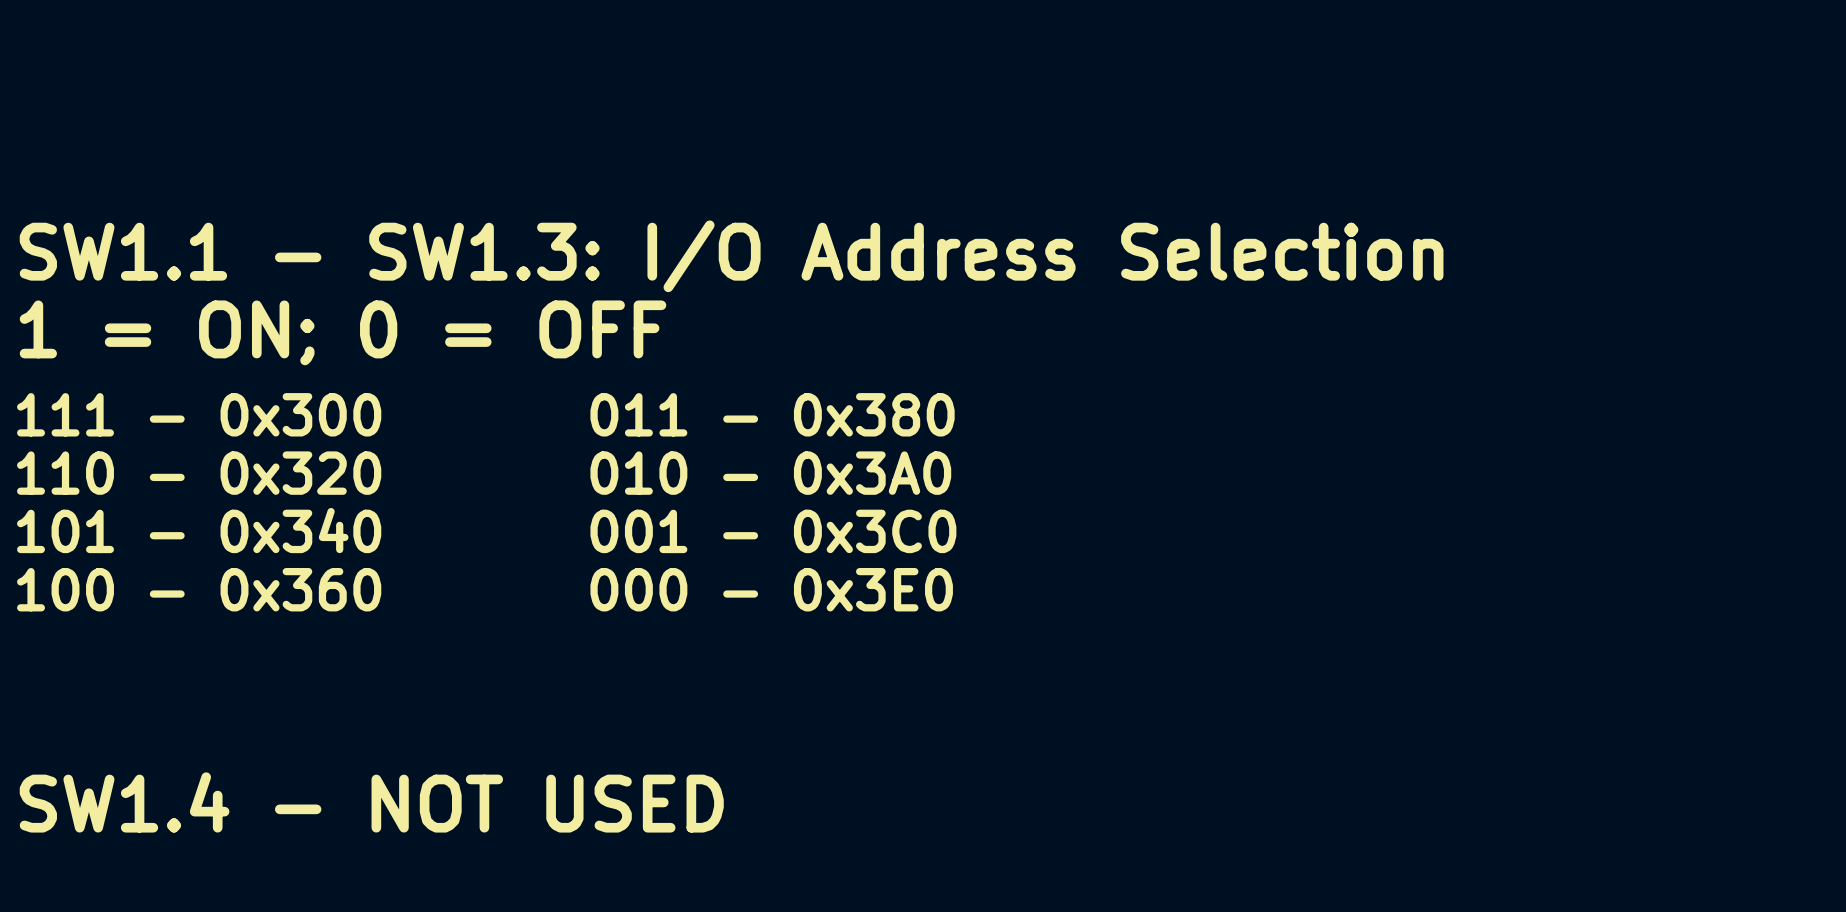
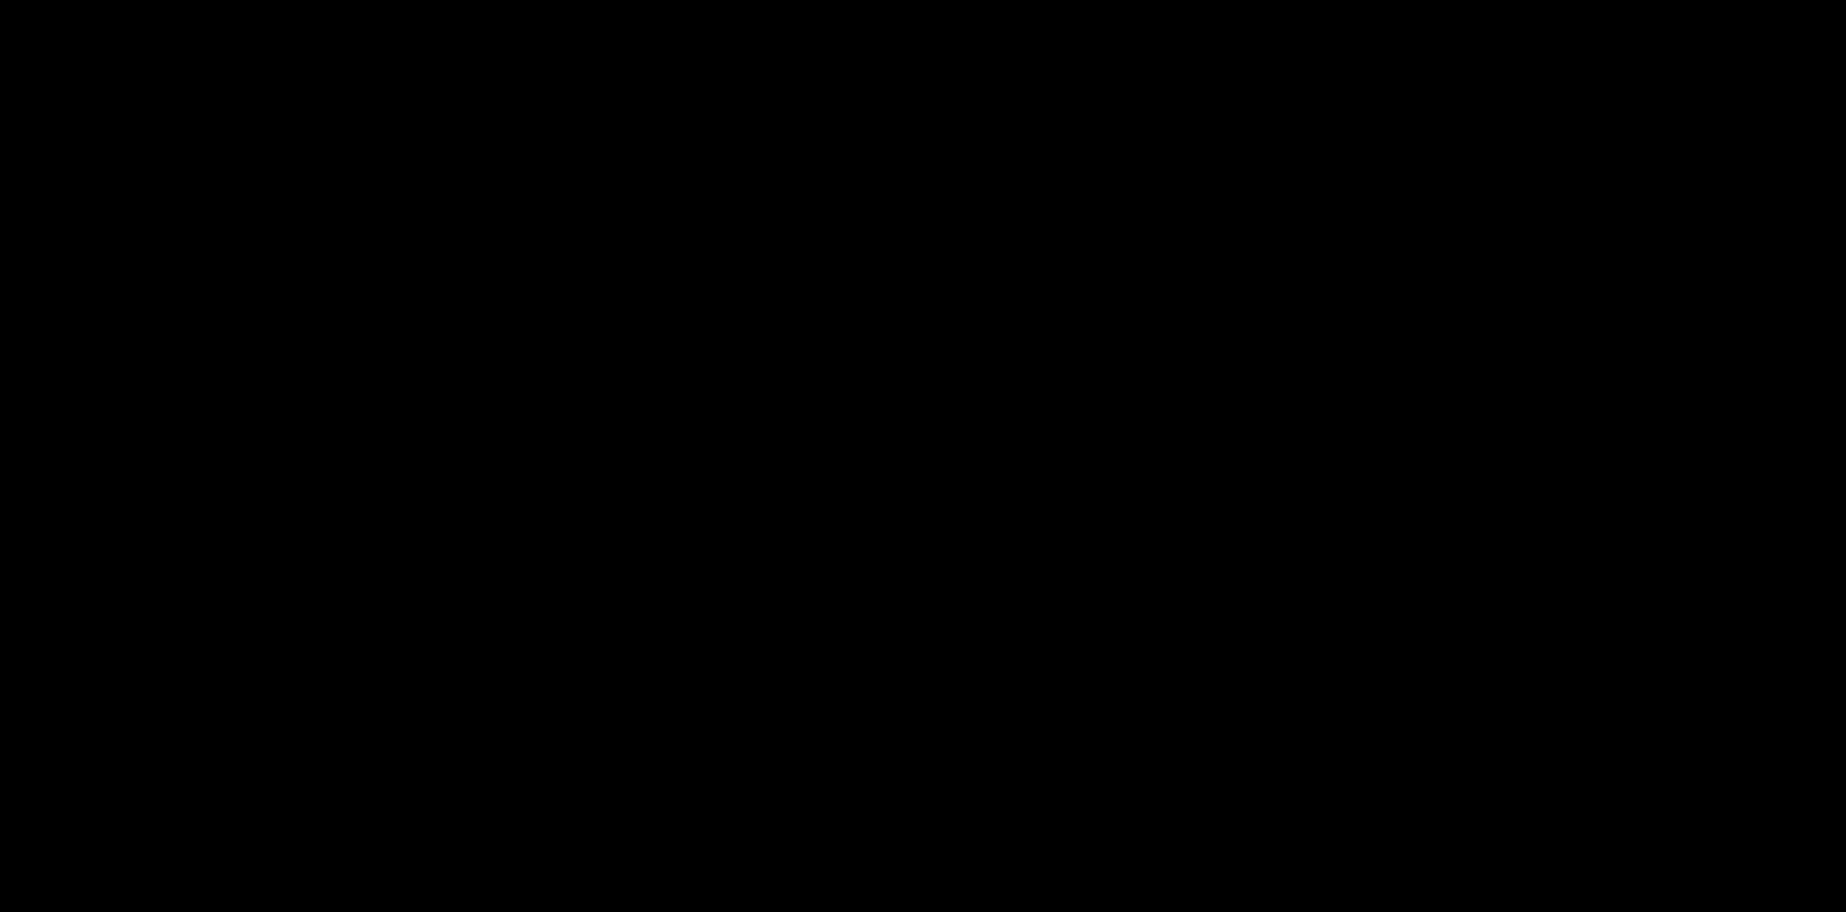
text: SW1.1 - SW1.3: I/O Address Selection (731, 256) -> none
text: 1 = ON; 0 = OFF (343, 332) -> none
text: 111 - 0x300 (199, 414) -> none
text: 011 - 0x380 (772, 414) -> none
text: 110 - 0x320 (199, 473) -> none
text: 010 - 0x3A0 (770, 473) -> none
text: 101 - 0x340 (199, 530) -> none
text: 001 - 0x3C0 (773, 531) -> none
text: 100 - 0x360 (199, 589) -> none
text: 000 - 0x3E0 (771, 589) -> none
text: SW1.4 - NOT USED (371, 802) -> none

